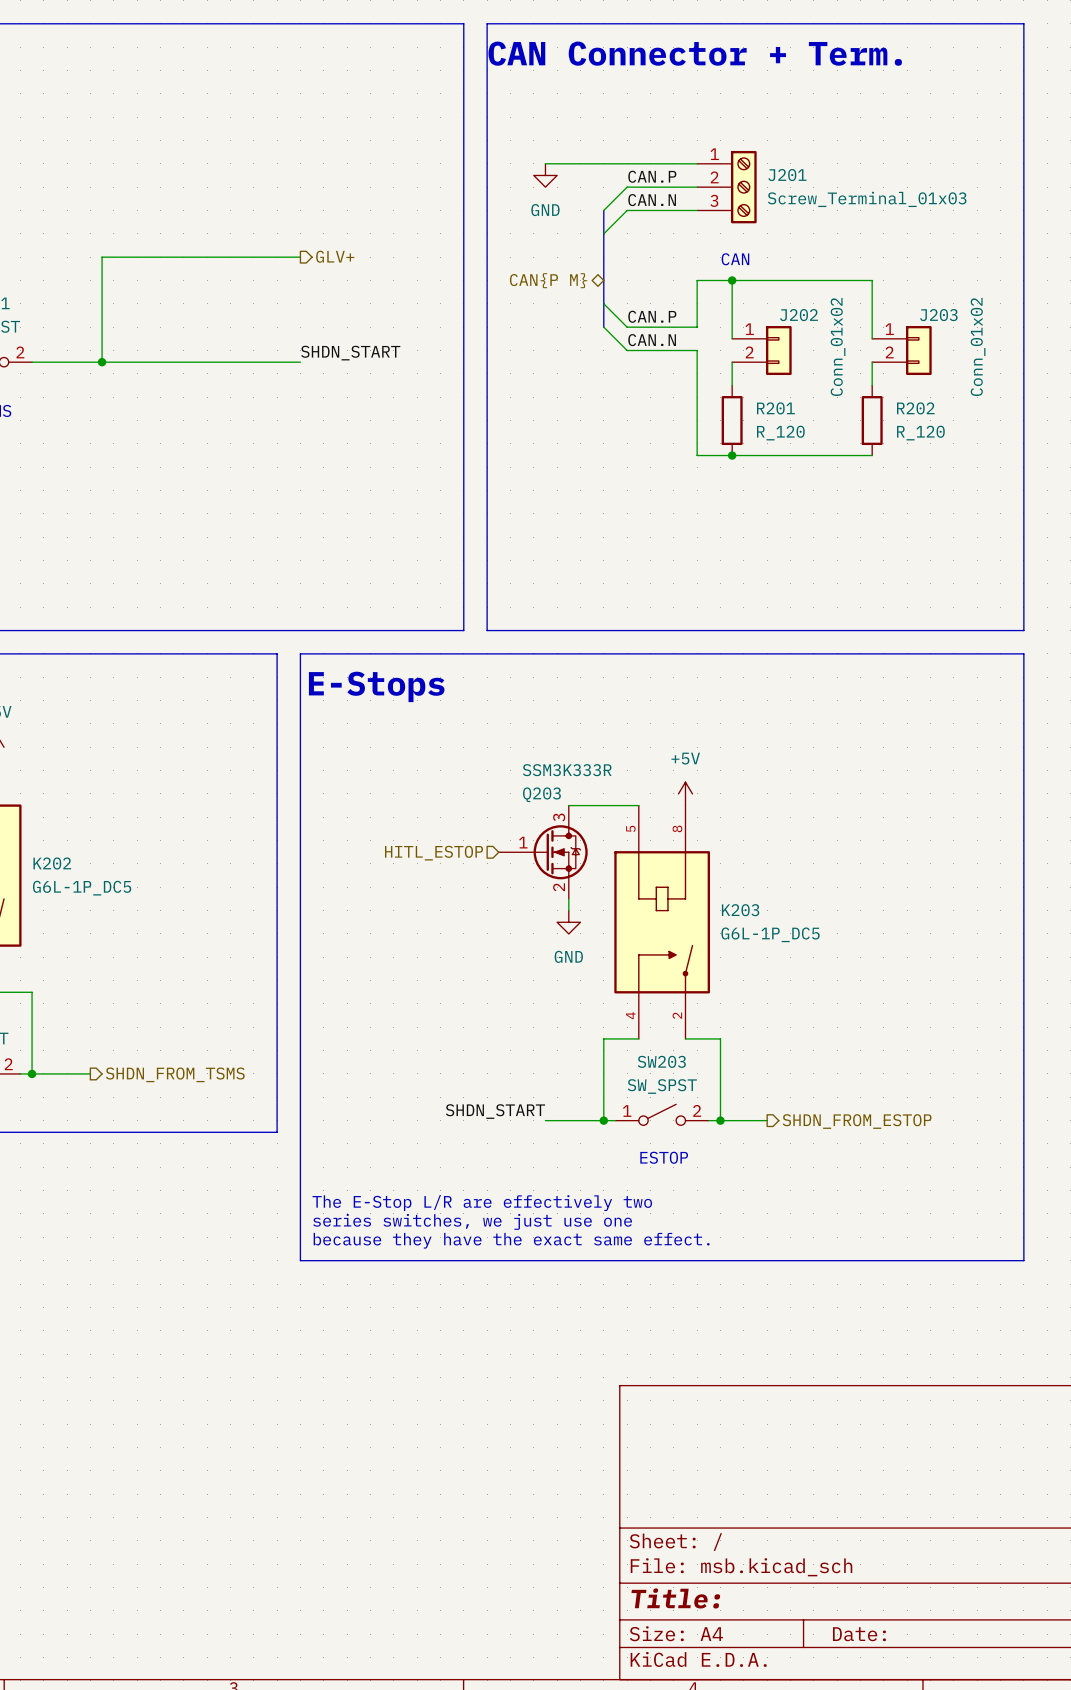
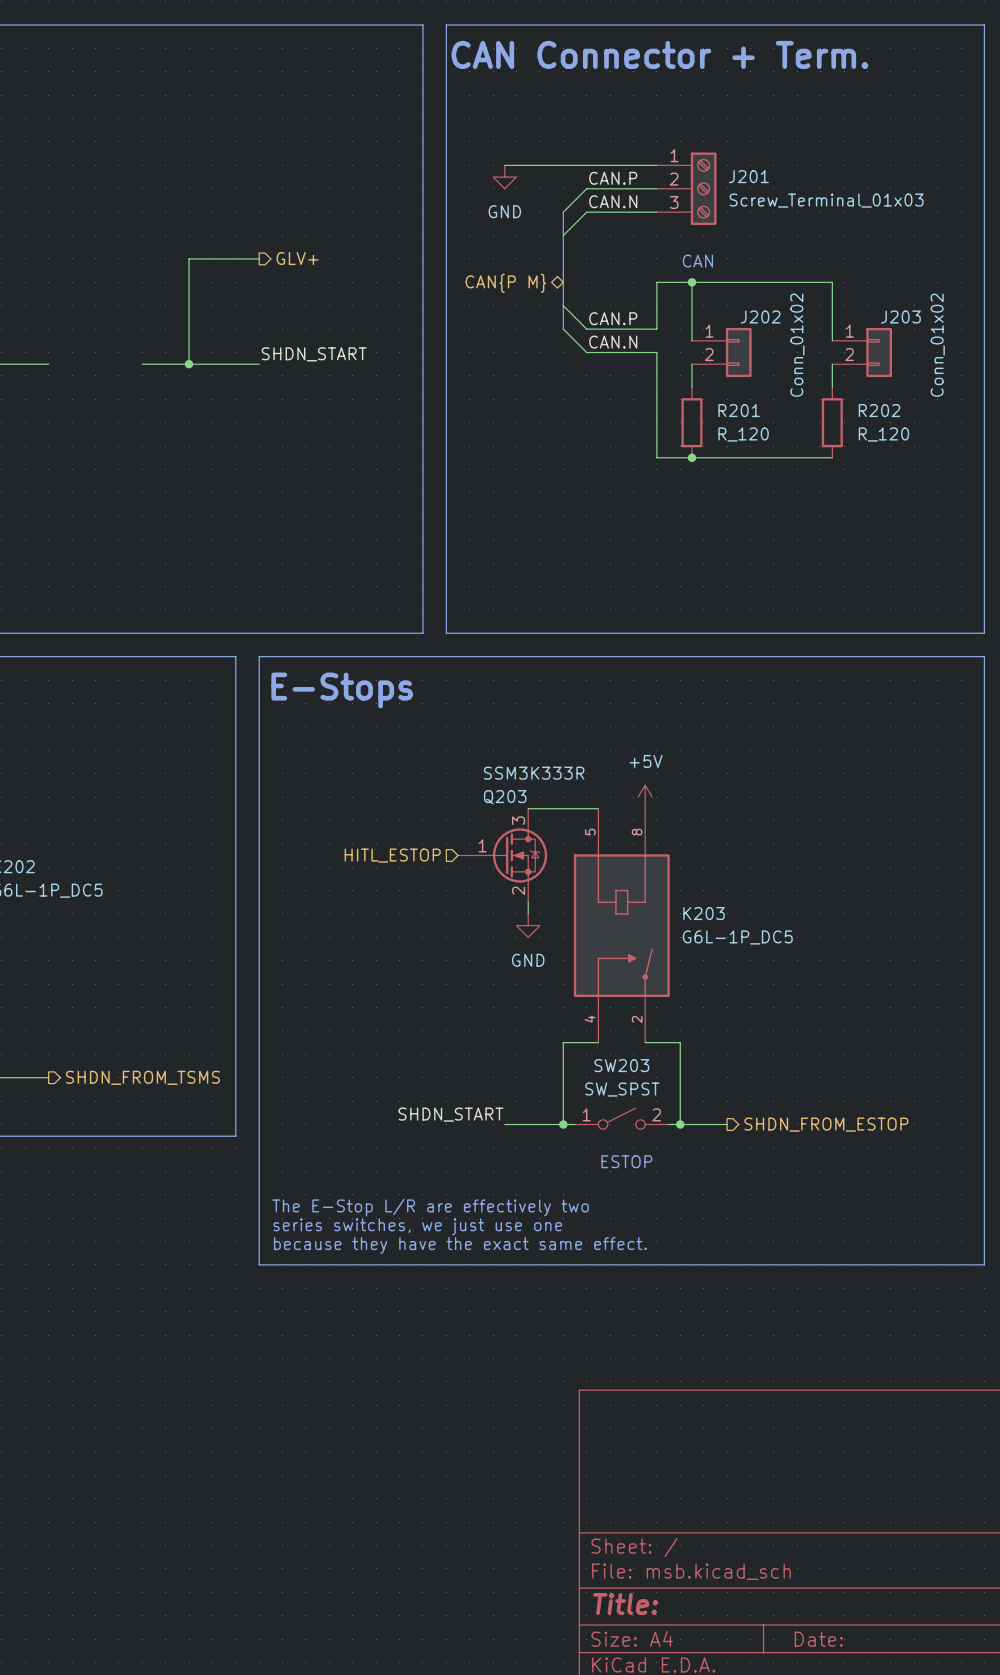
wire: (230, 257) (102, 257) (102, 362) -> (189, 258) (189, 364)
wire: (90, 362) (183, 362) -> none
junction: (102, 362) -> none
junction: none -> (189, 364)

